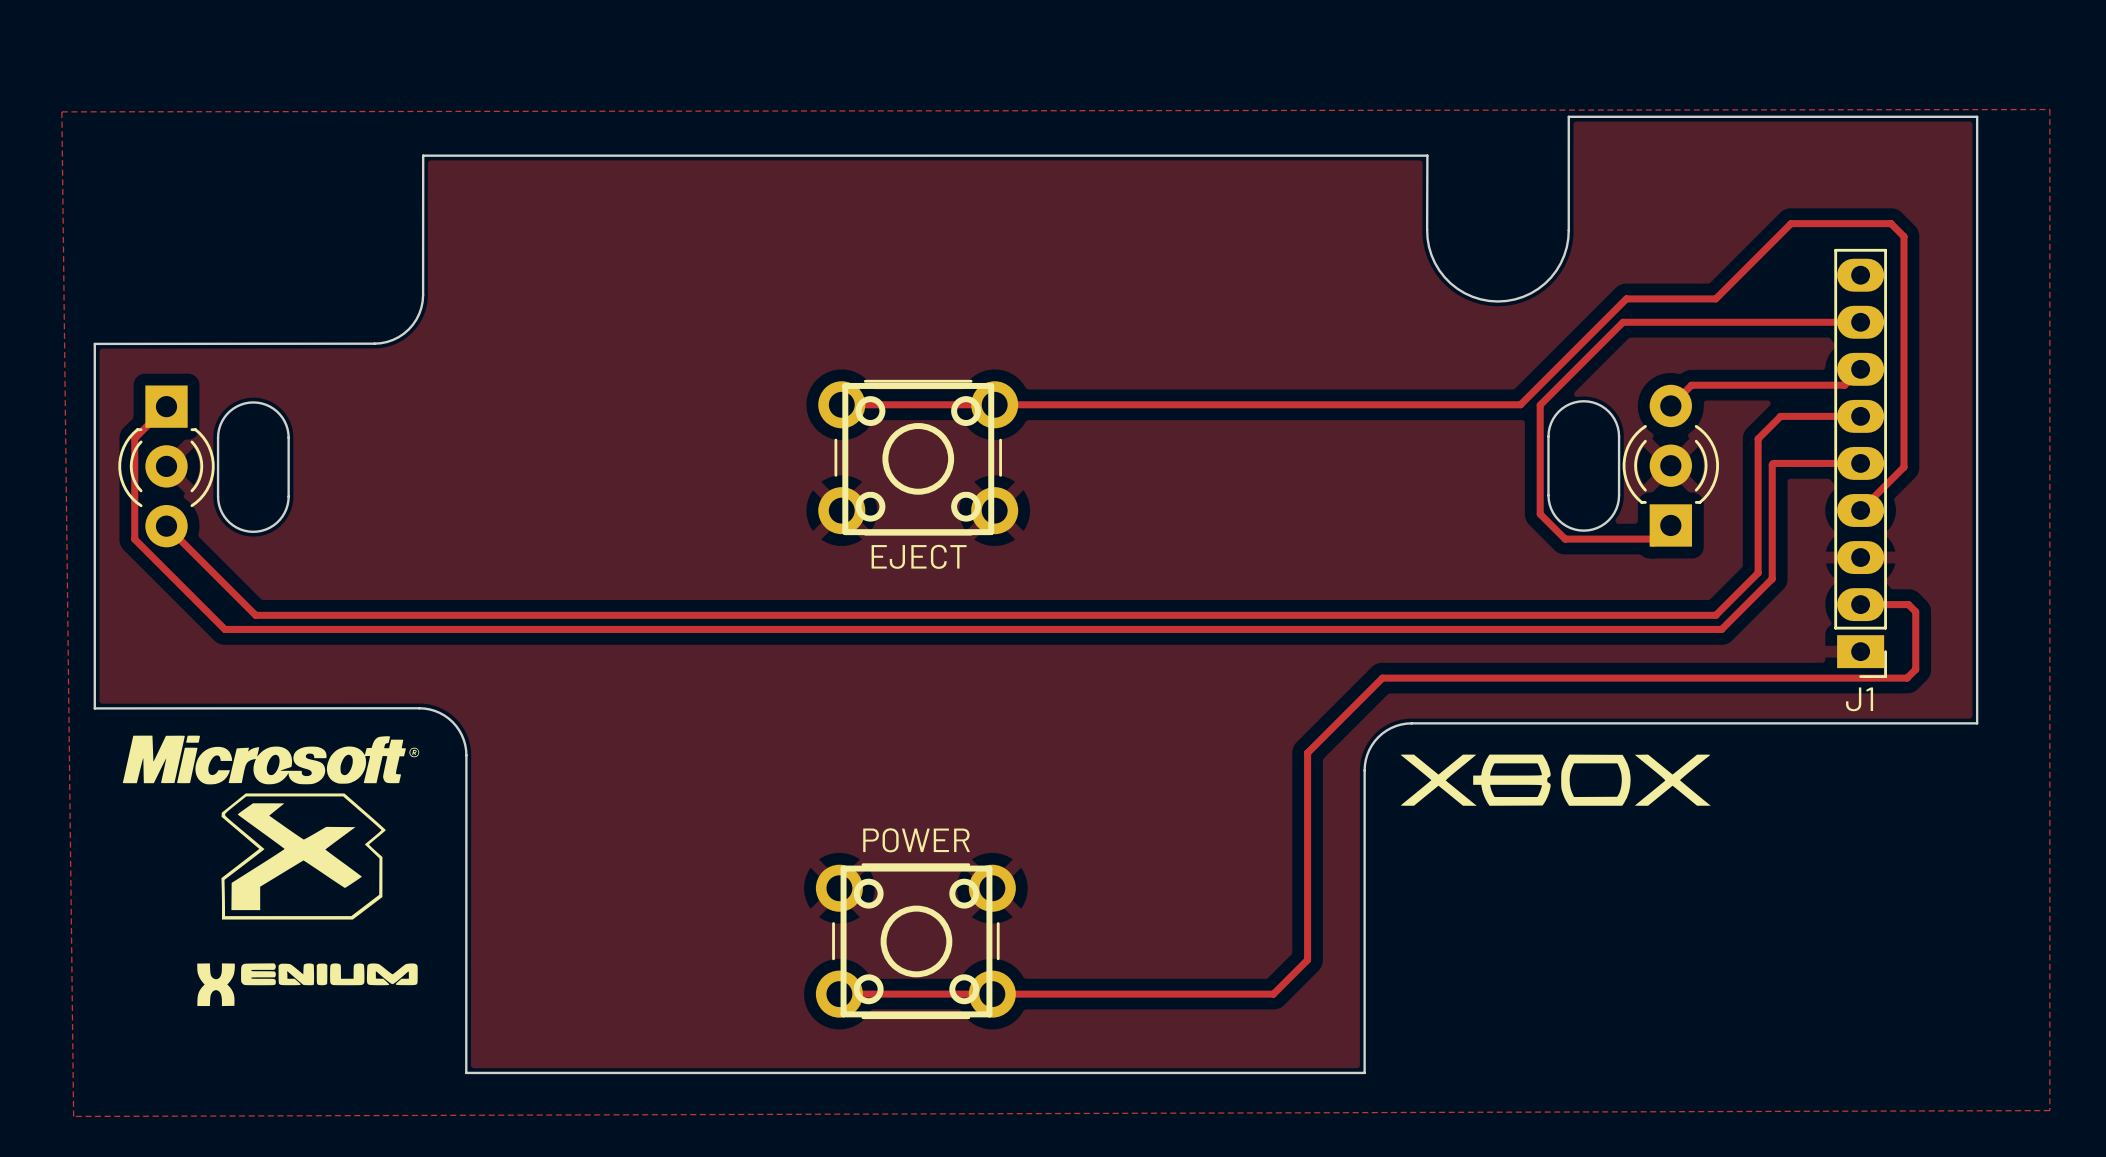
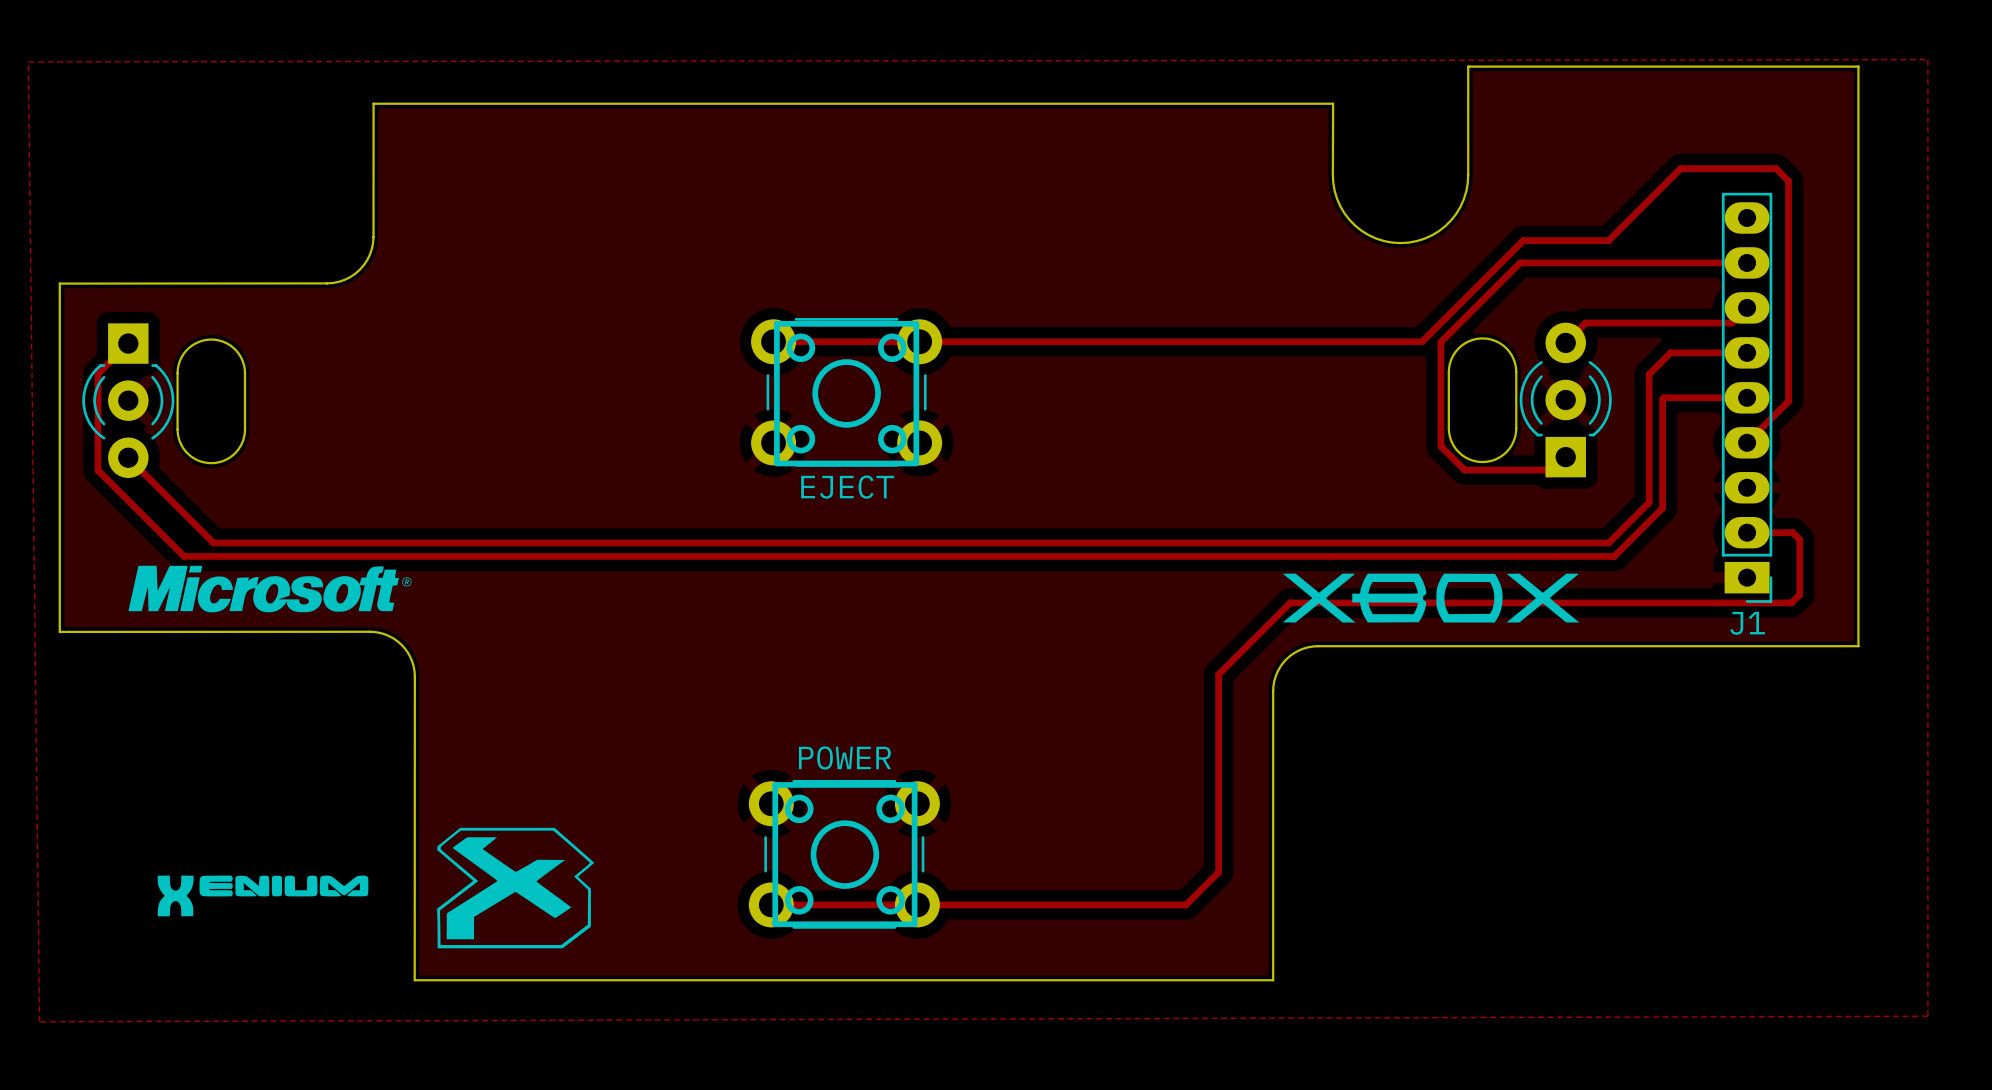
drawing position: (271, 760) -> (269, 589)
drawing position: (1555, 780) -> (1431, 598)
drawing position: (303, 856) -> (515, 888)

